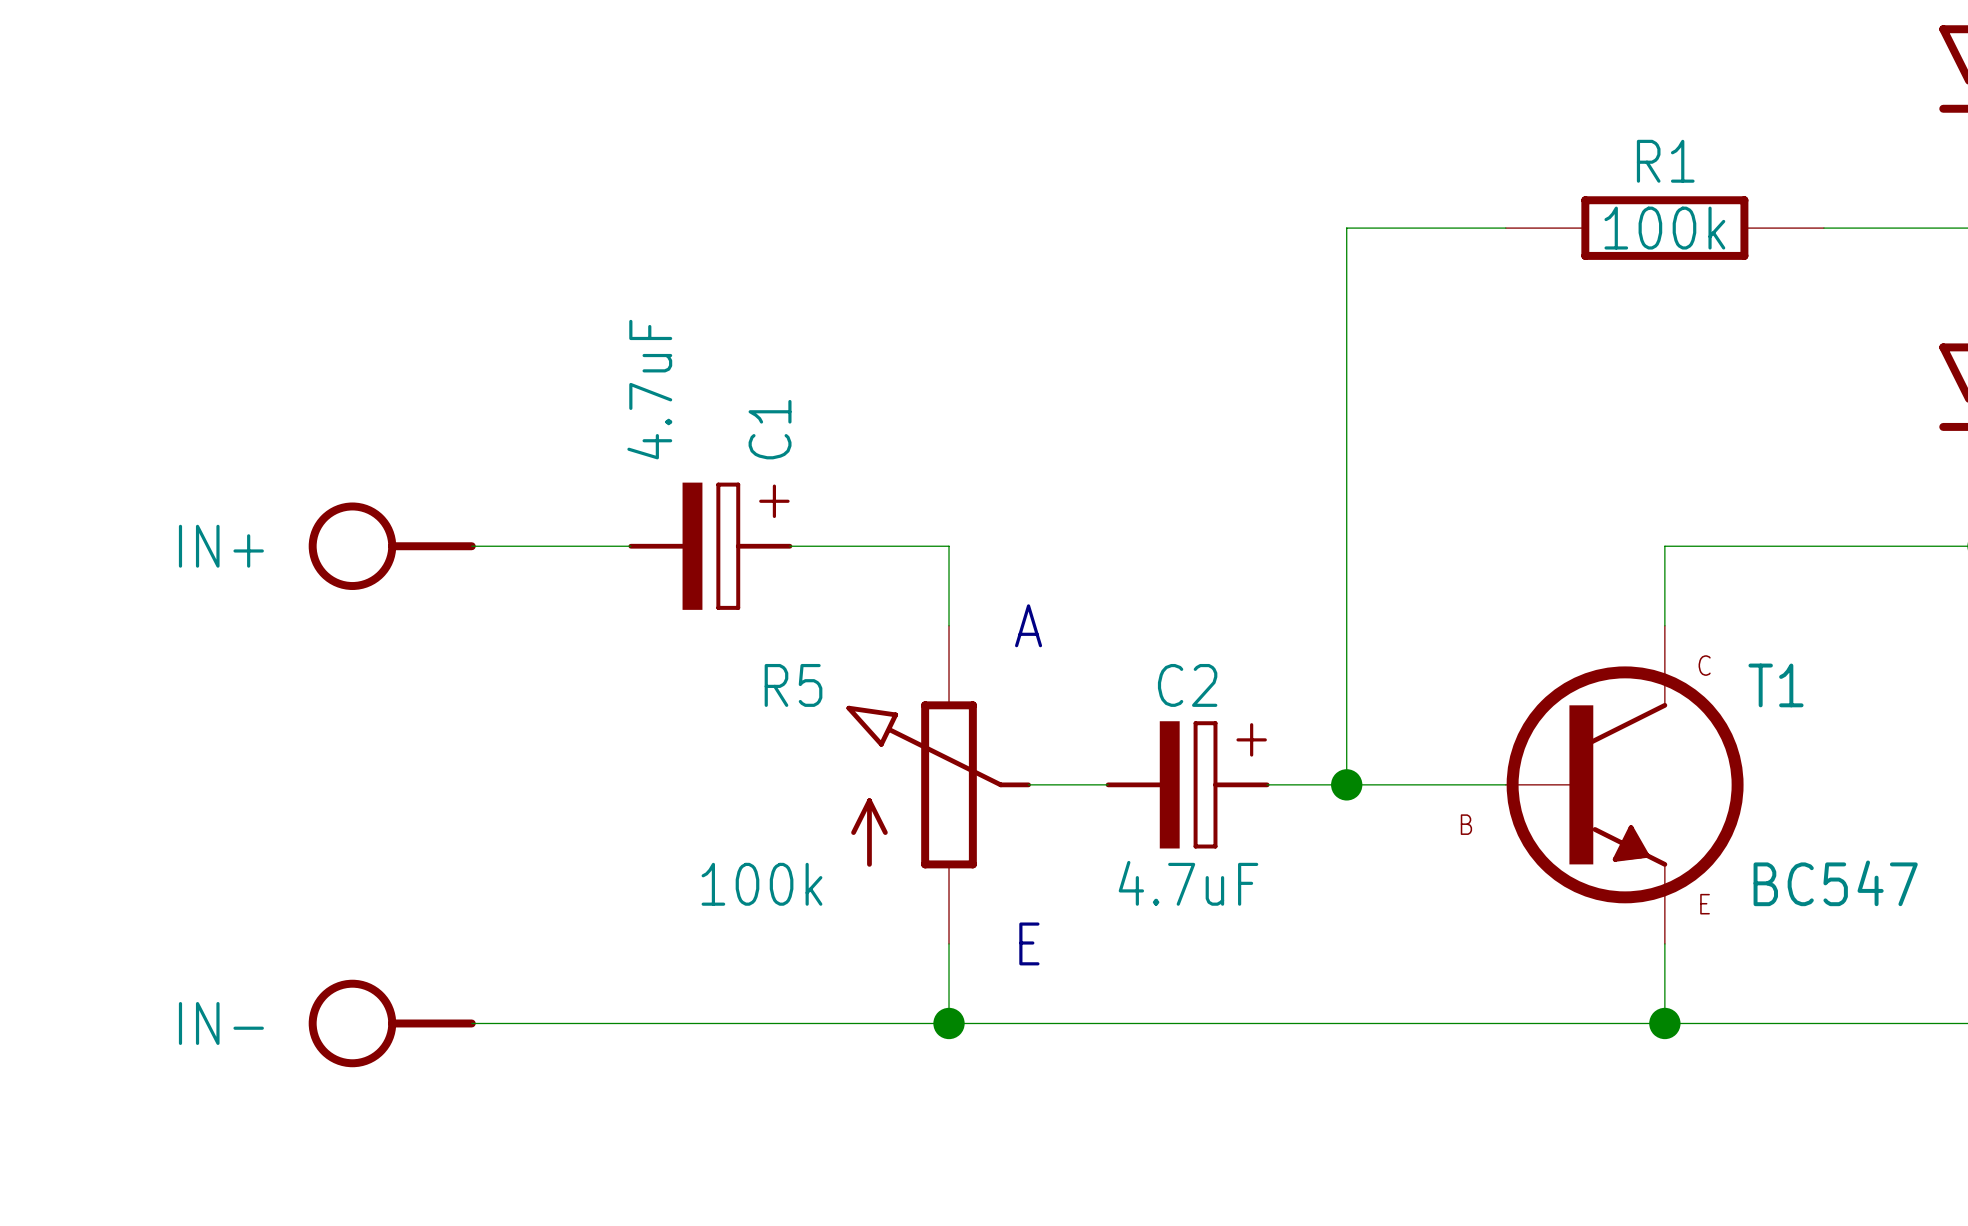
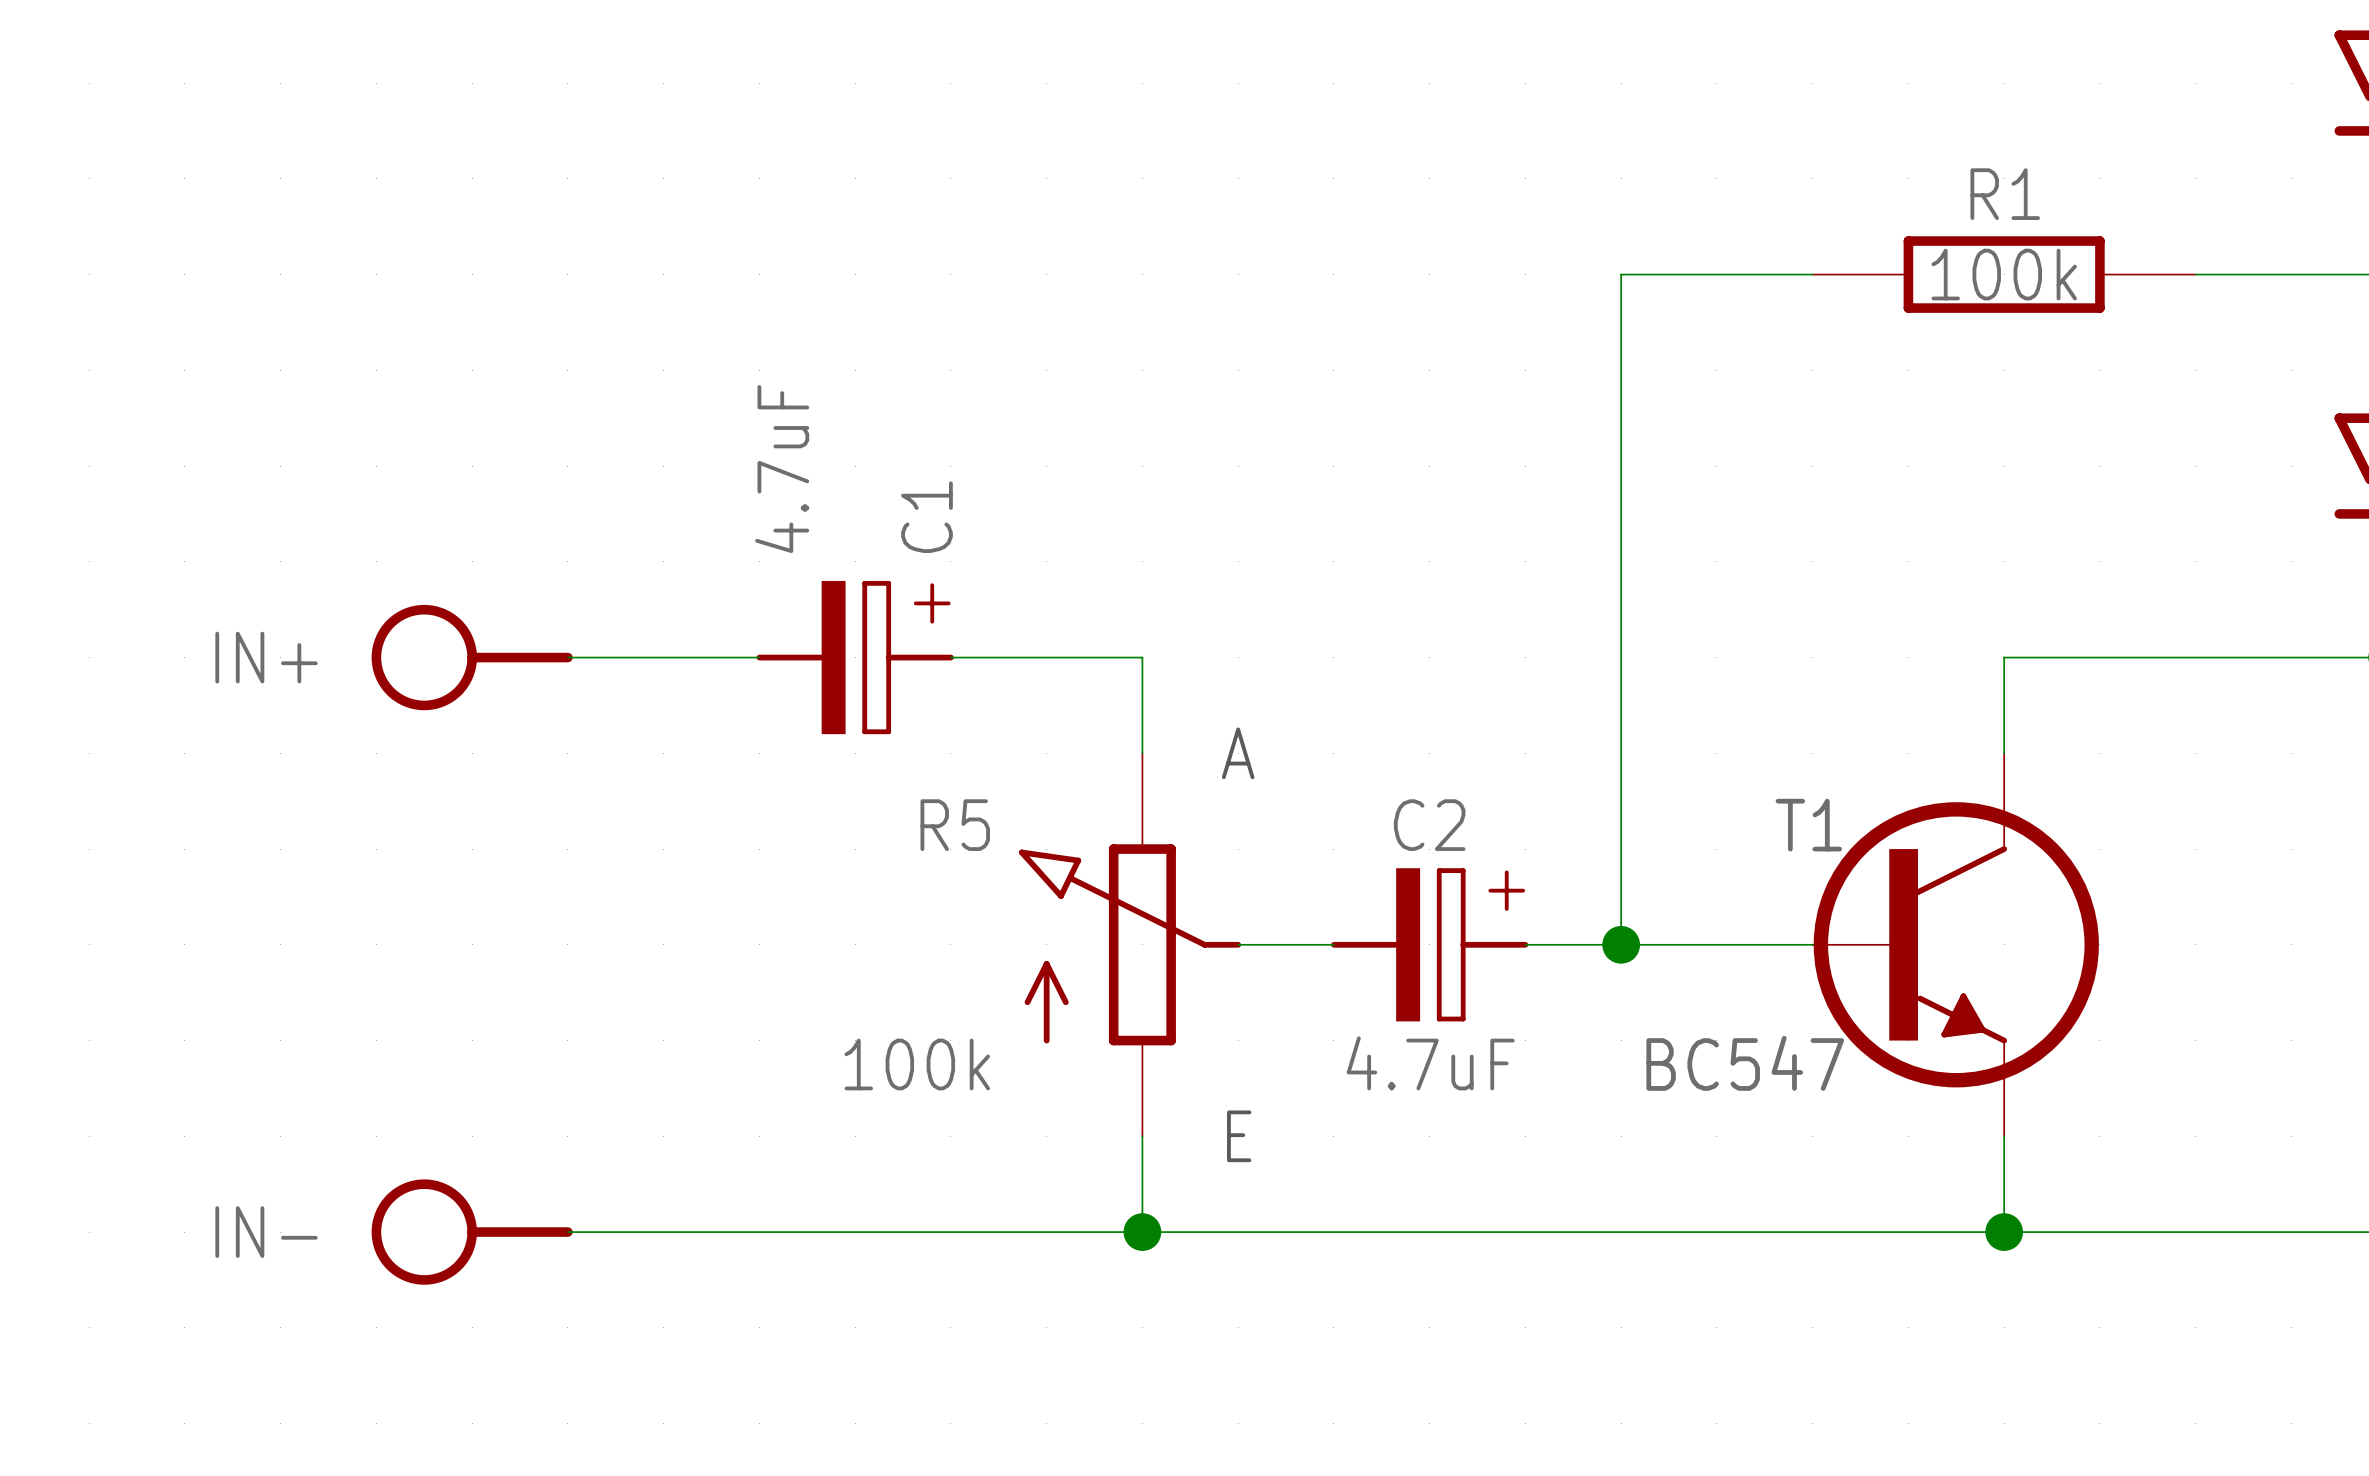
T1 text: C (1704, 665) -> none
T1 name position: T1 (1776, 685) -> T1 (1808, 825)
T1 text: B (1466, 824) -> none
T1 value position: BC547 (1835, 883) -> BC547 (1745, 1063)
T1 text: E (1705, 904) -> none

